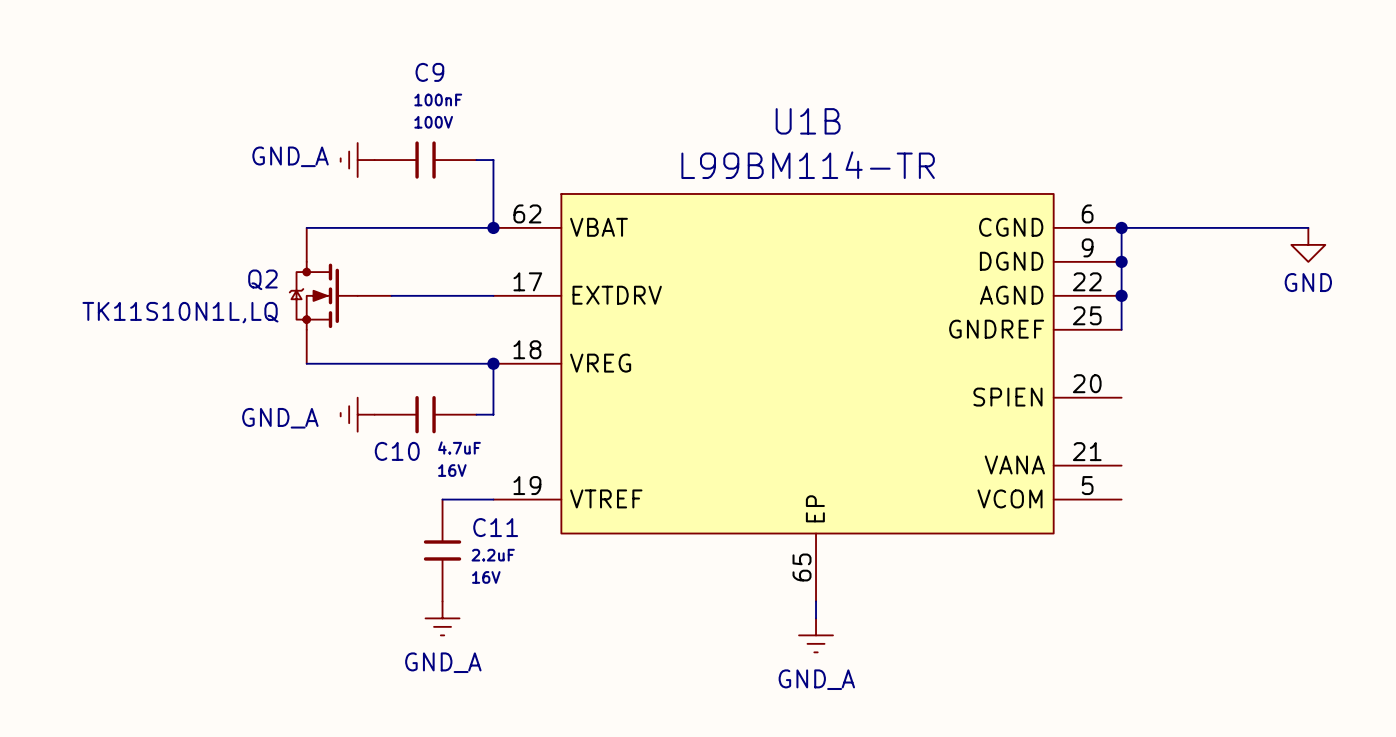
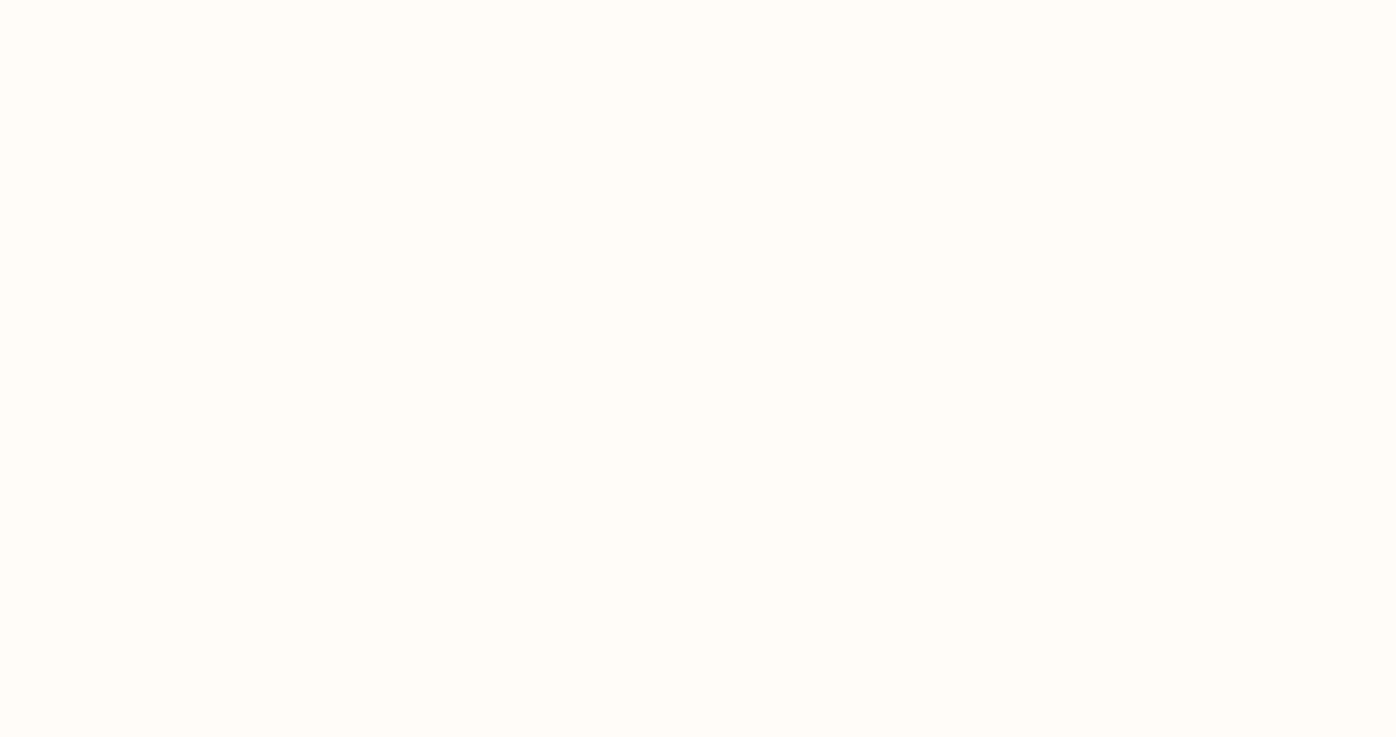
power symbol: GND_A (357, 160) -> none
C9: 100nF (425, 160) -> none
wire: (476, 160) (493, 160) (493, 227) (306, 227) -> none
junction: (493, 227) -> none
junction: (1121, 227) -> none
wire: (1308, 227) (1121, 227) (1121, 329) -> none
power symbol: GND (1308, 244) -> none
junction: (1121, 261) -> none
Q2: TK11S10N1L,LQ (340, 295) -> none
wire: (391, 295) (493, 295) -> none
junction: (1121, 295) -> none
wire: (306, 363) (493, 363) (493, 414) (476, 414) -> none
junction: (493, 363) -> none
U1B: L99BM114-TR (807, 397) -> none
power symbol: GND_A (357, 414) -> none
C10: 4.7uF (425, 414) -> none
wire: (442, 499) (493, 499) -> none
C11: 2.2uF (442, 550) -> none
wire: (816, 601) (816, 618) -> none
power symbol: GND_A (442, 618) -> none
power symbol: GND_A (816, 635) -> none

